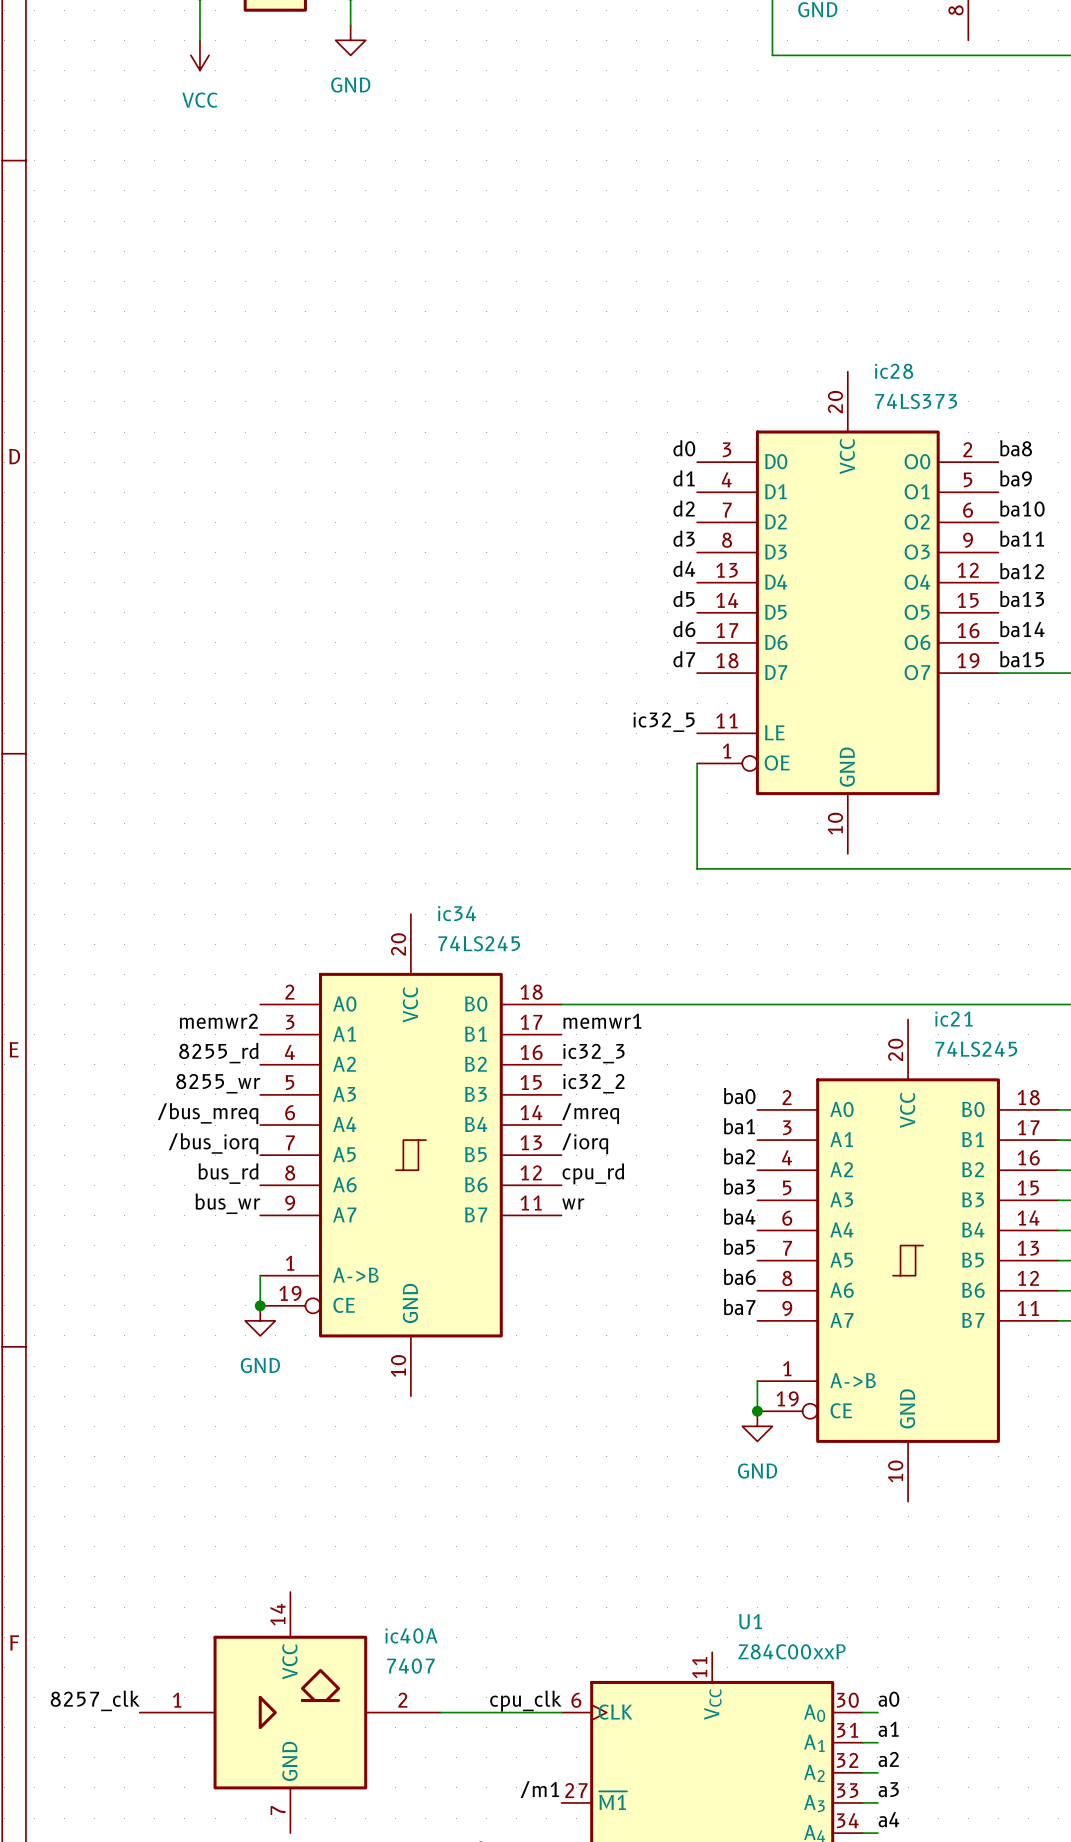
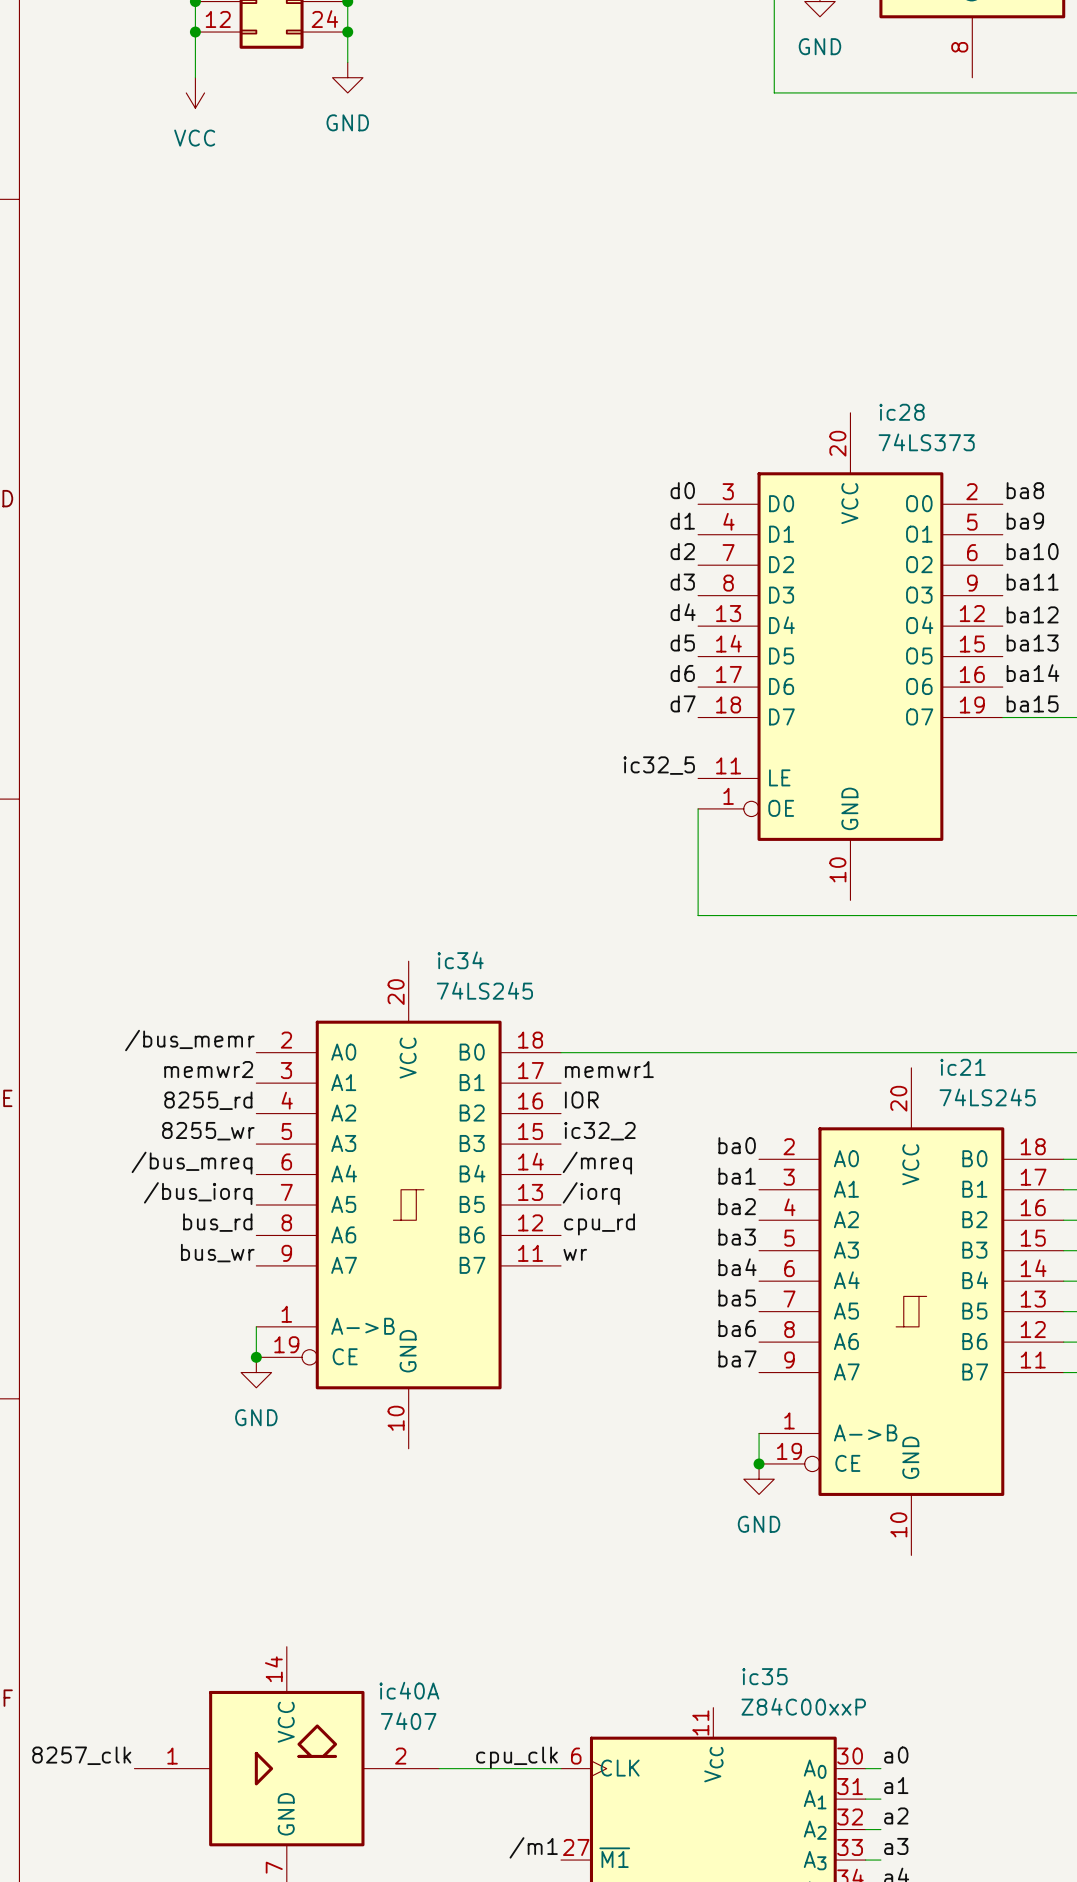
label: none -> /bus_memr (189, 1040)
label: ic32_3 (594, 1053) -> IOR (581, 1100)
U1 name: U1 (750, 1621) -> ic35 (764, 1676)

